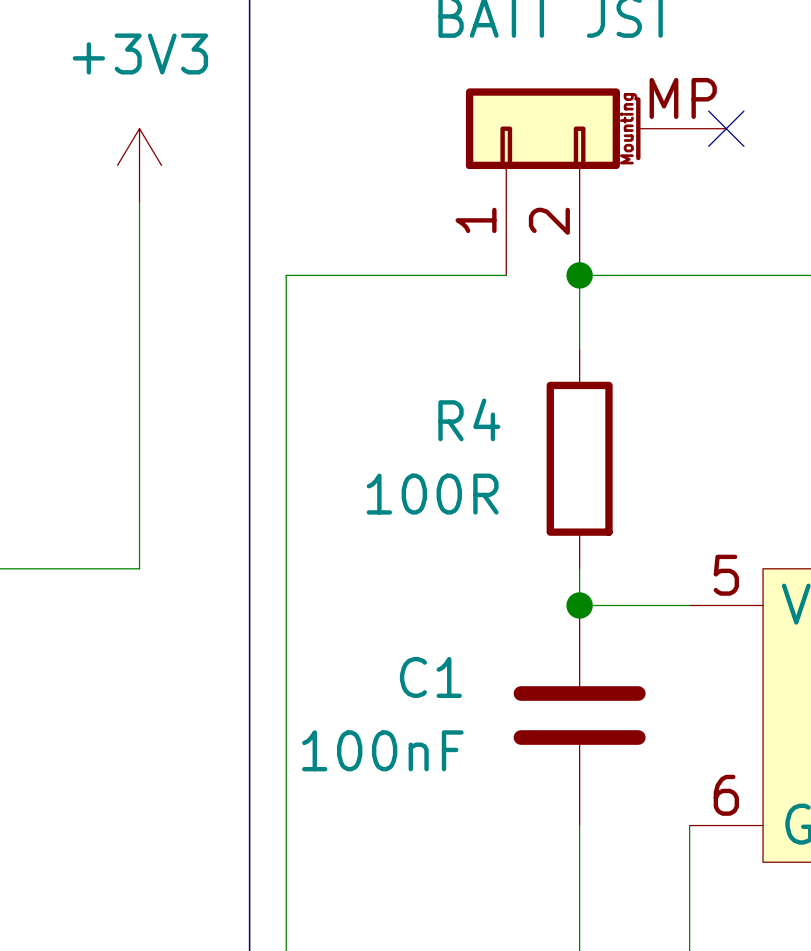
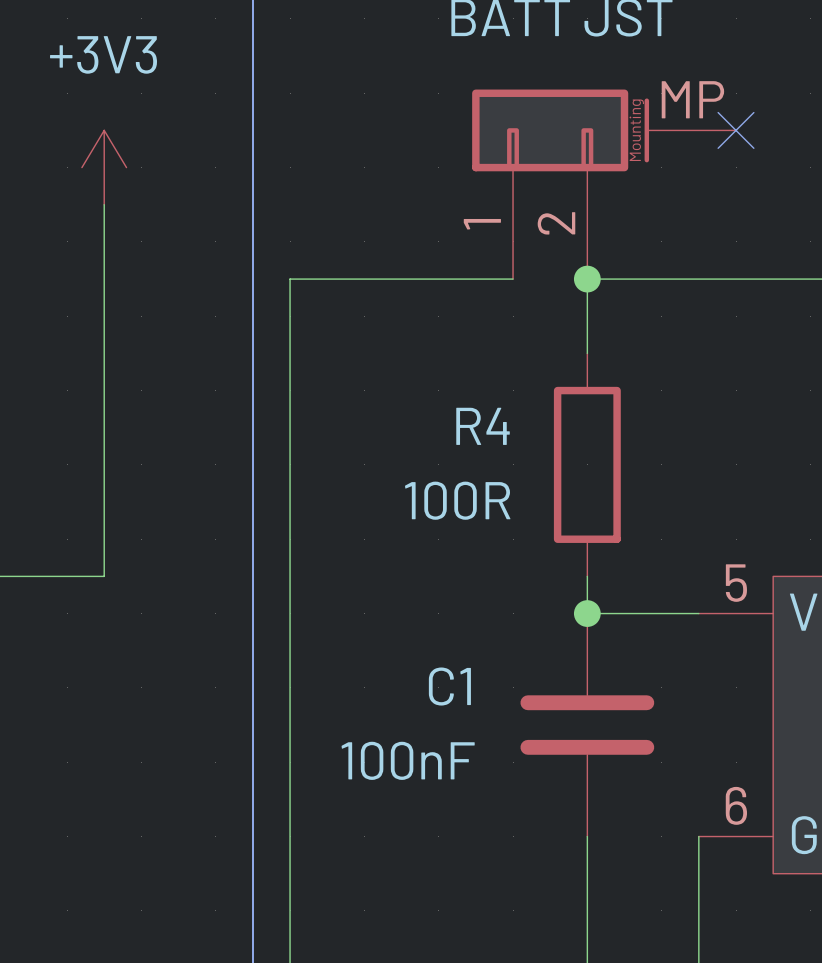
power symbol position: +3V3 (139, 165) -> +3V3 (104, 167)
wire: (139, 202) (139, 568) (102, 568) -> (104, 204) (104, 576)

